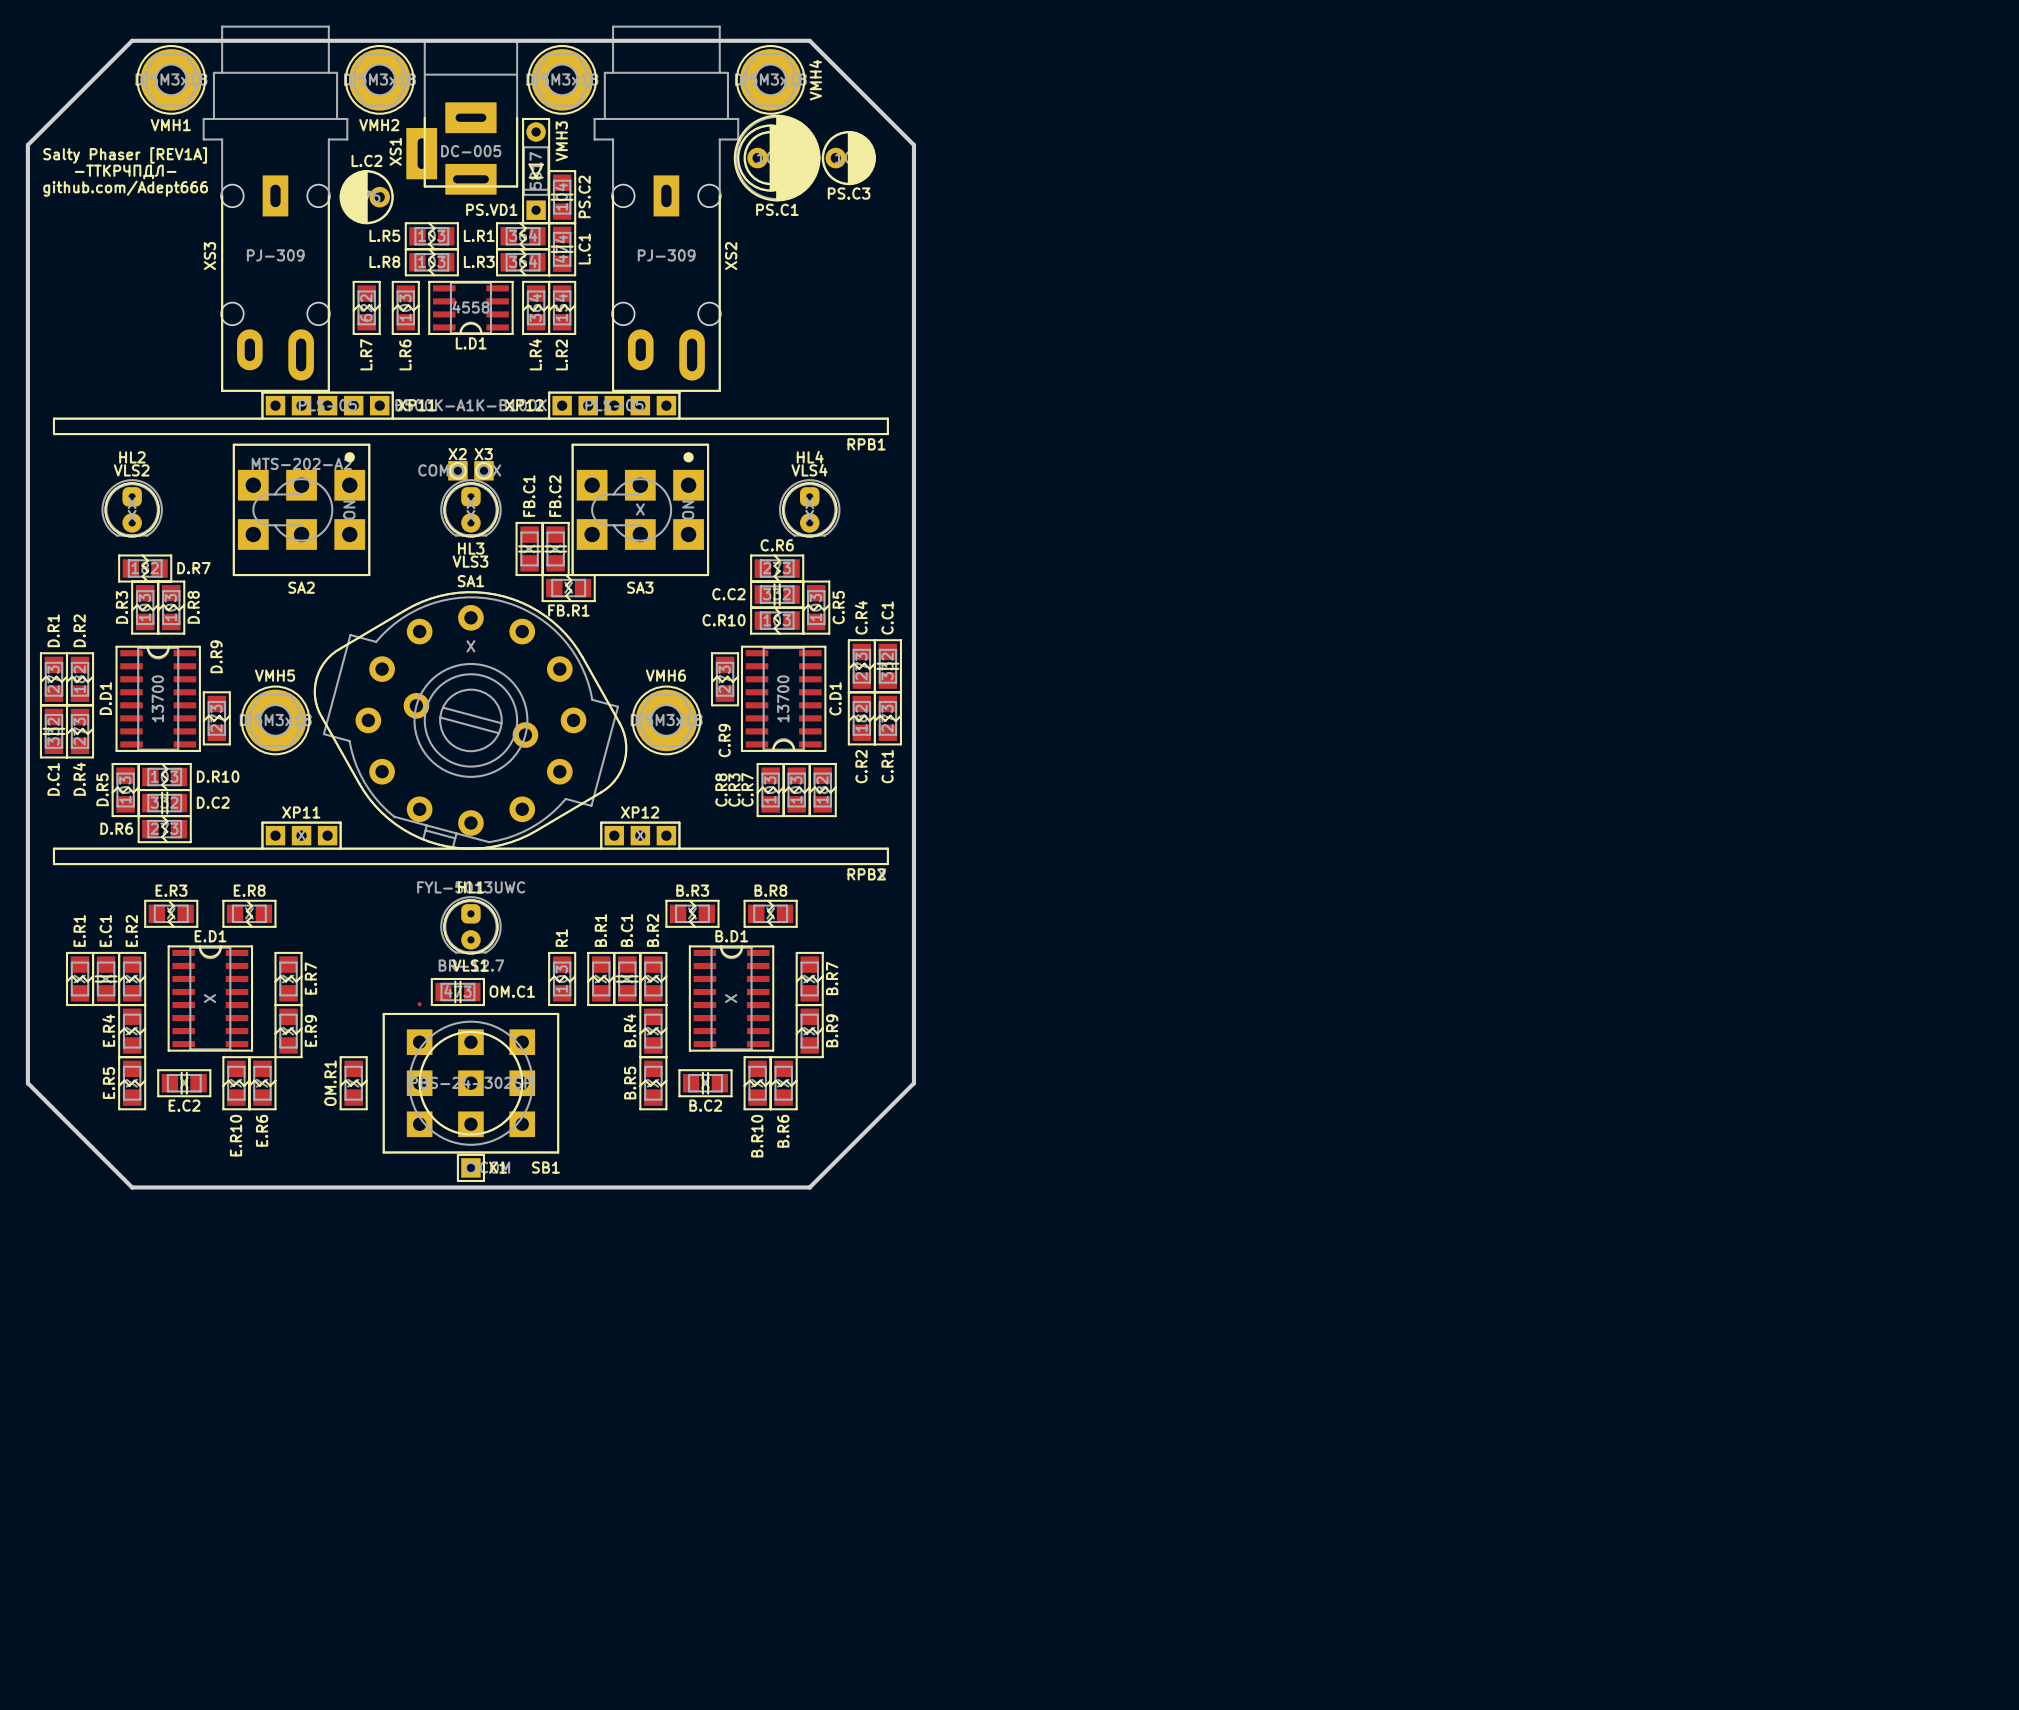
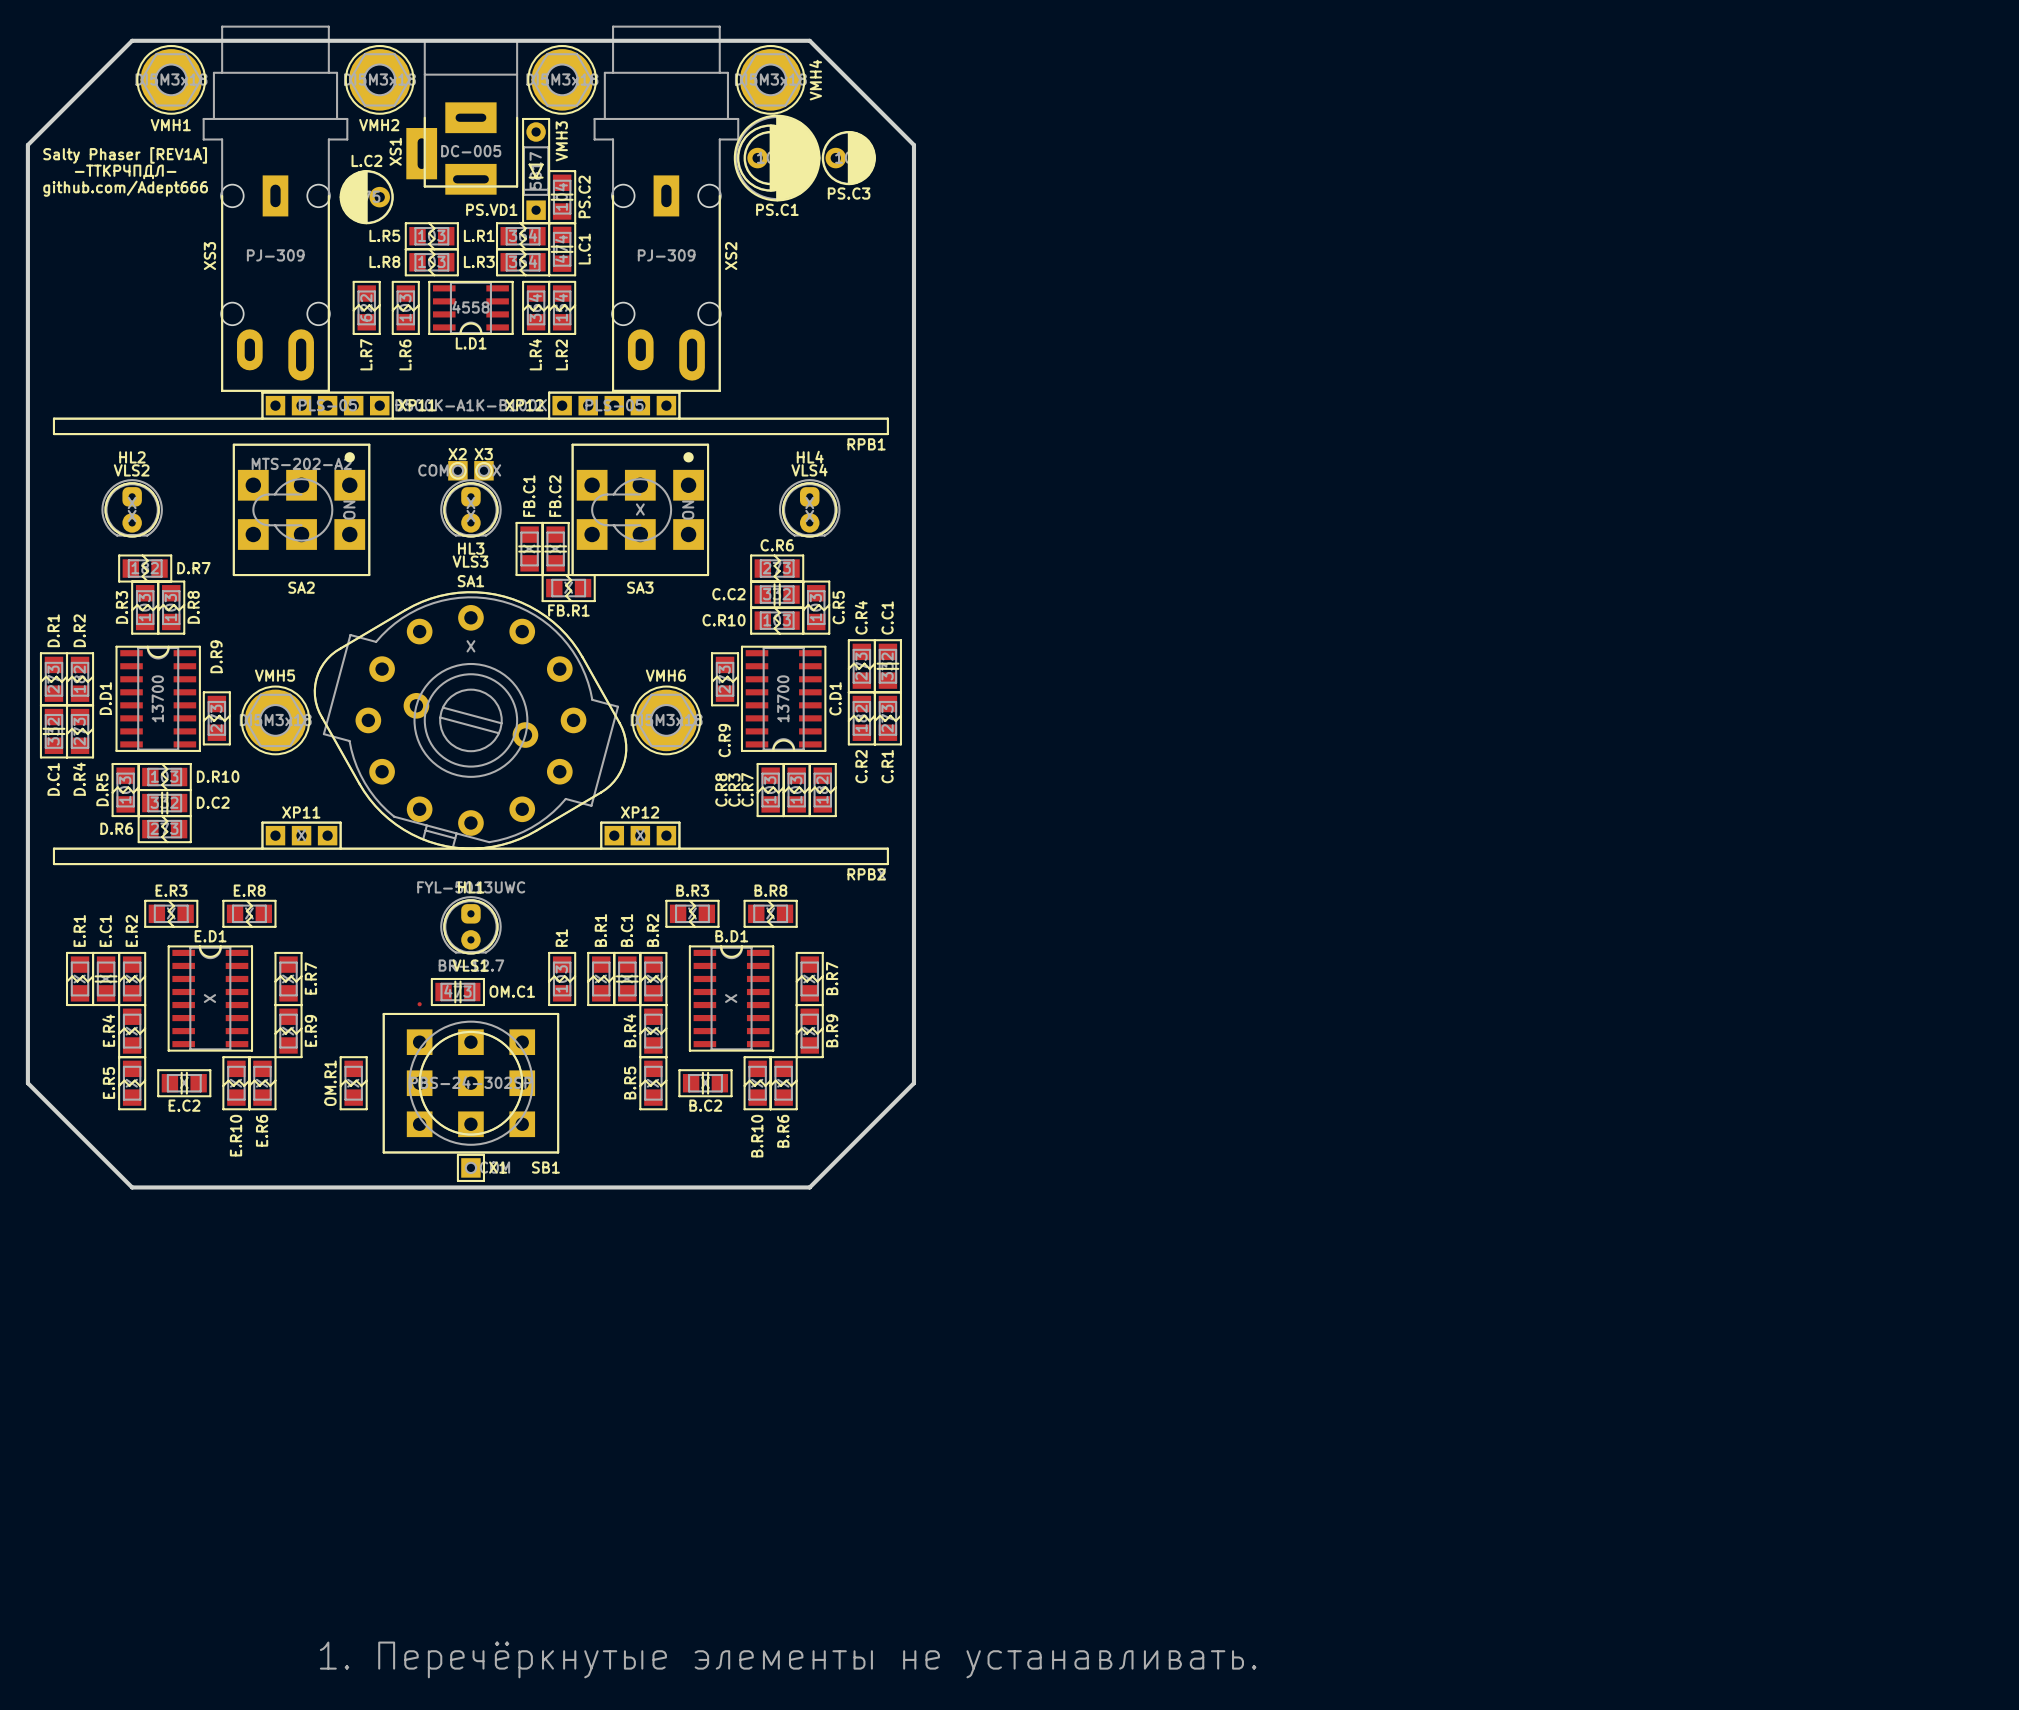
text: none -> 1. Перечёркнутые элементы не устанавливать. (788, 1659)

